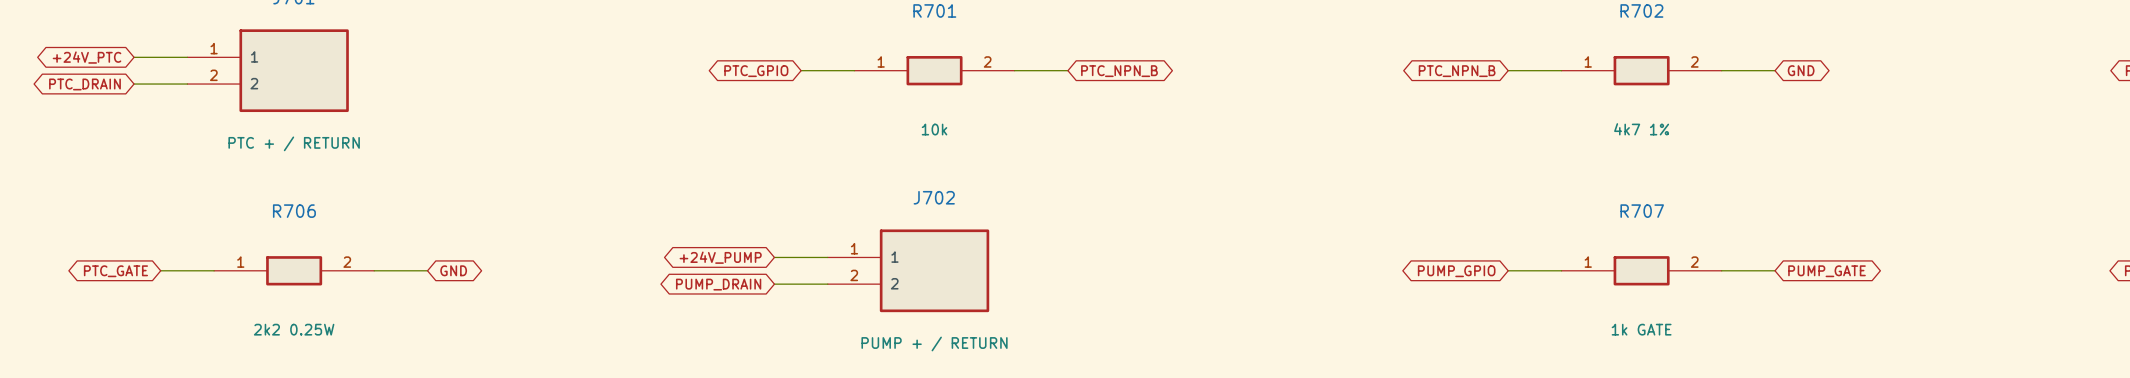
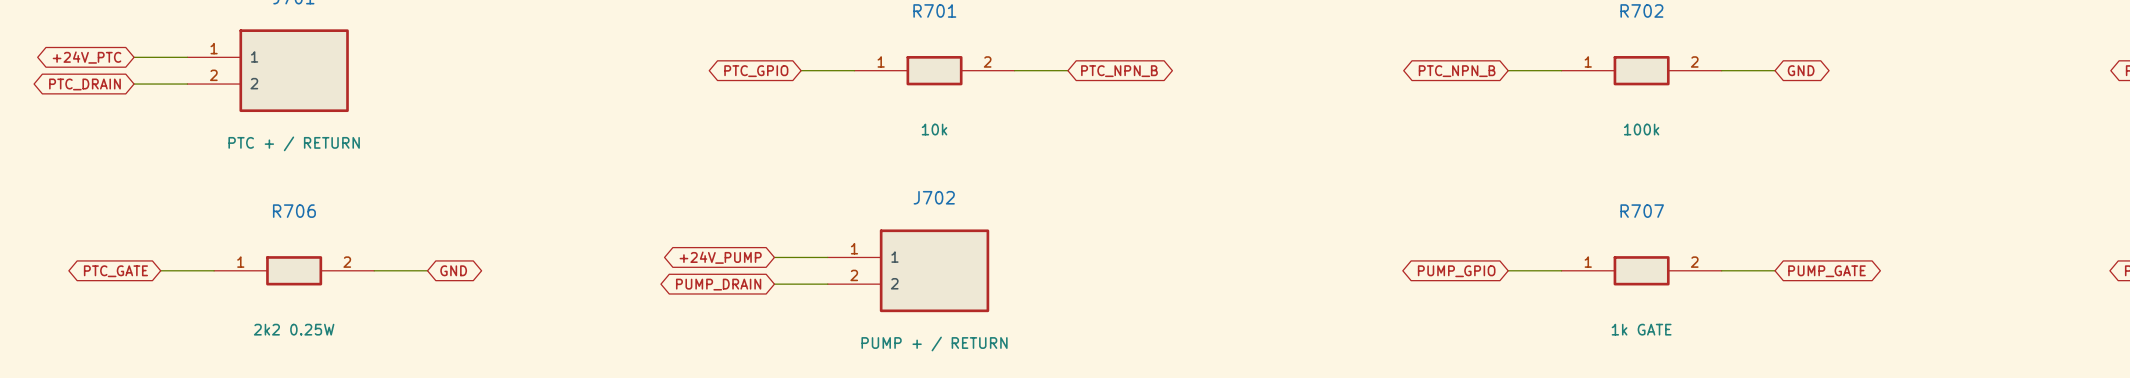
R702 value: 4k7 1% (1641, 129) -> 100k (1641, 129)

